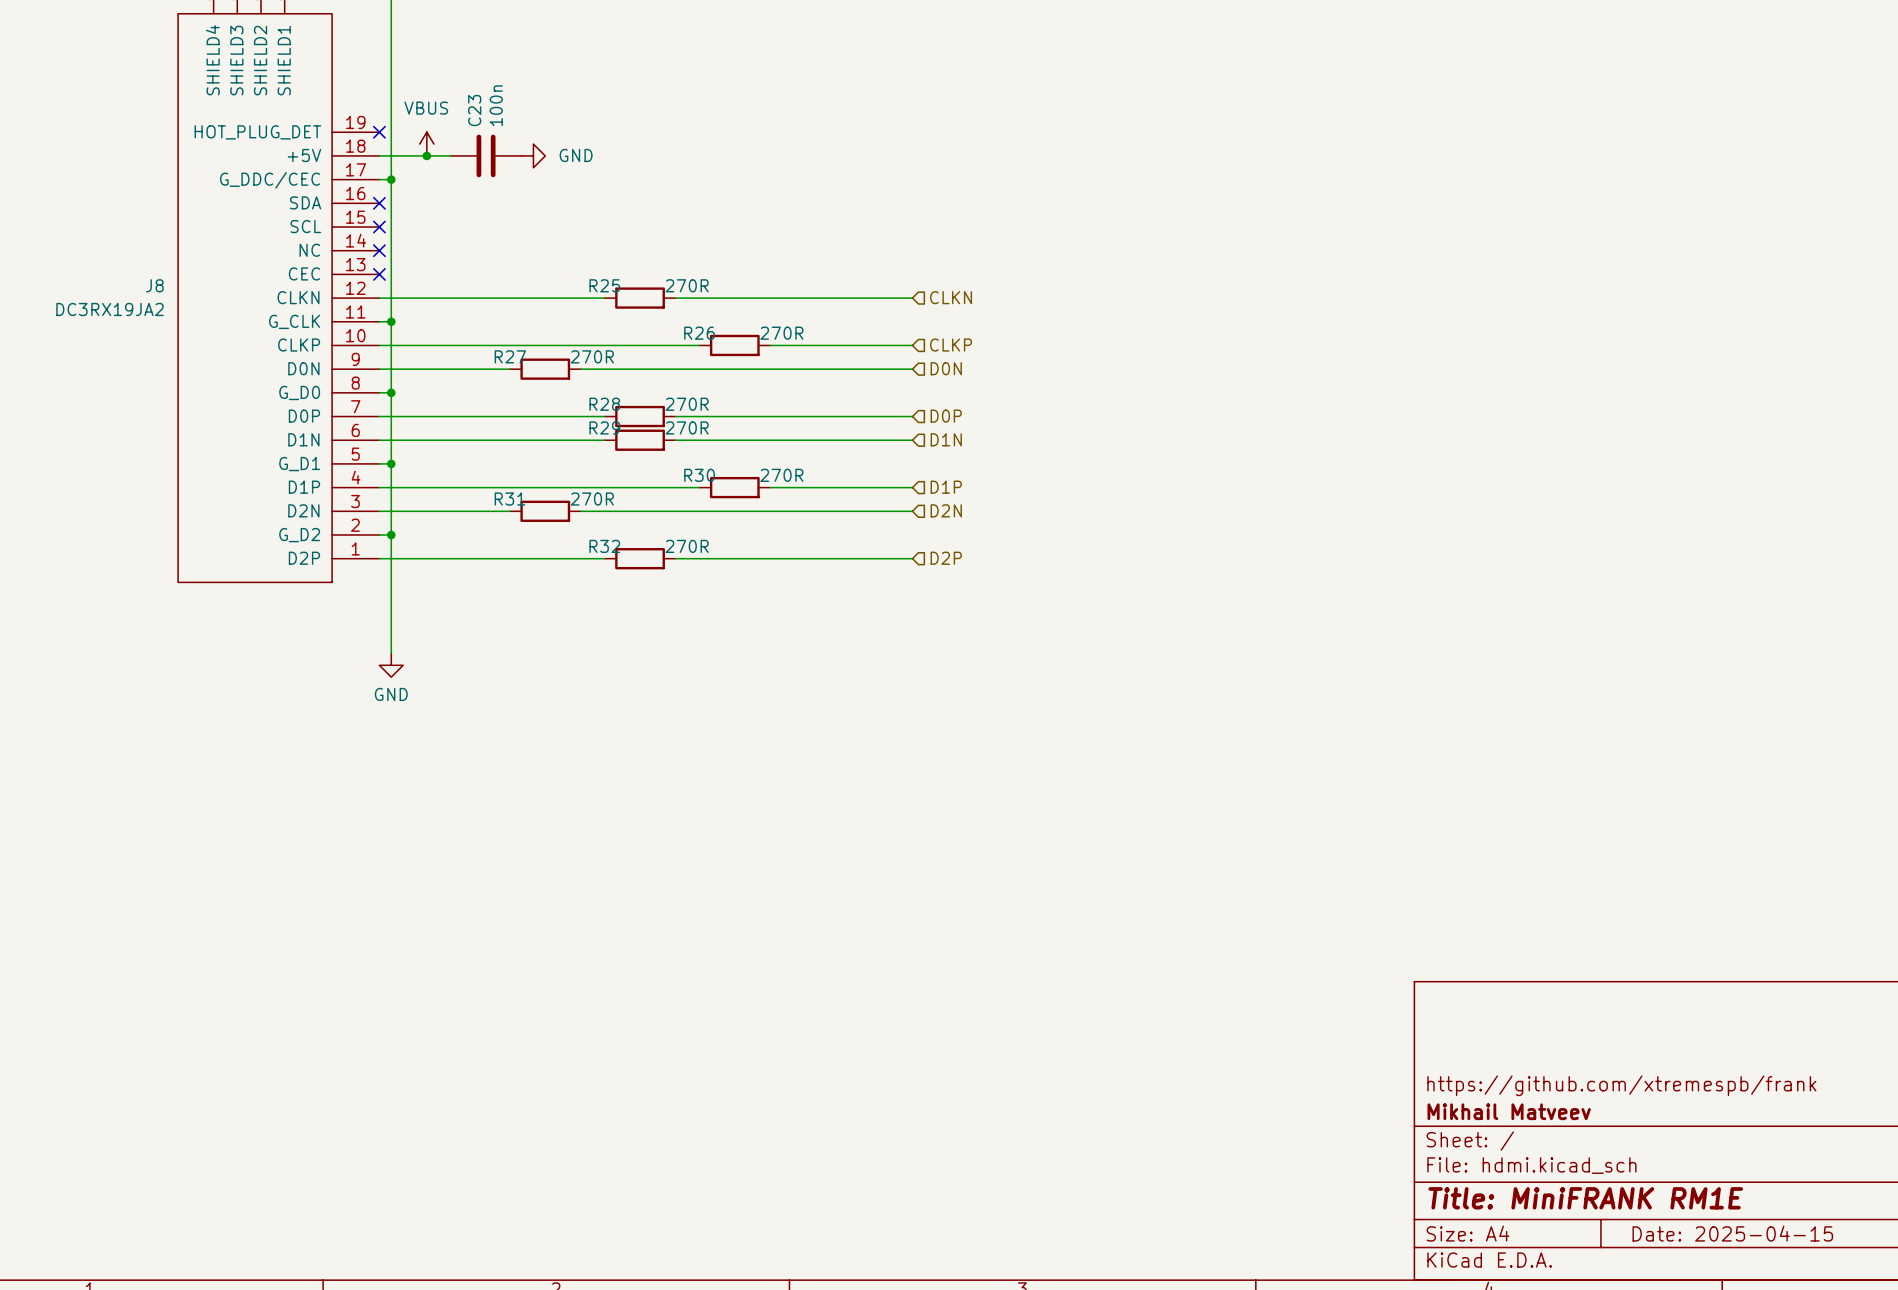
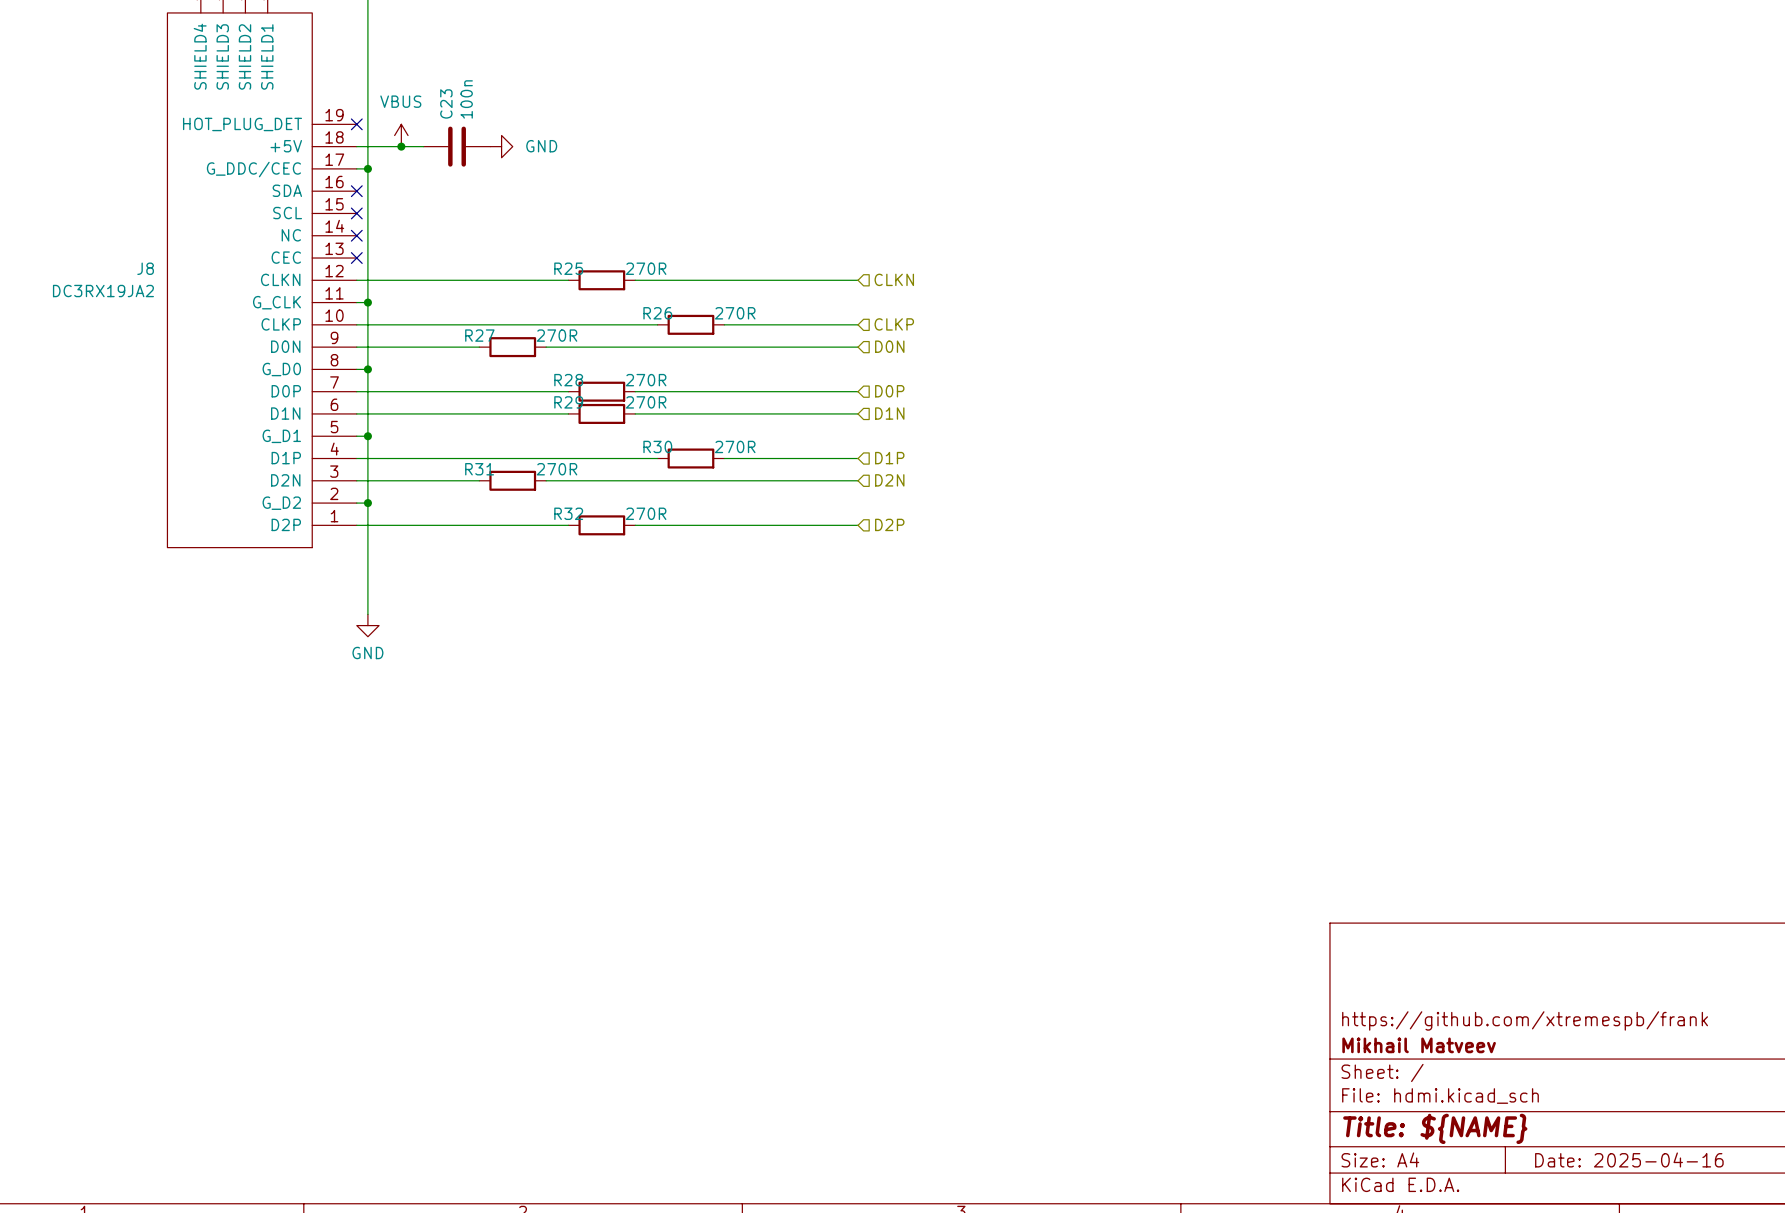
title block: Title: MiniFRANK RM1E (1585, 1198) -> Title: ${NAME} (1435, 1128)
title block: Date: 2025-04-15 (1732, 1233) -> Date: 2025-04-16 (1629, 1159)

